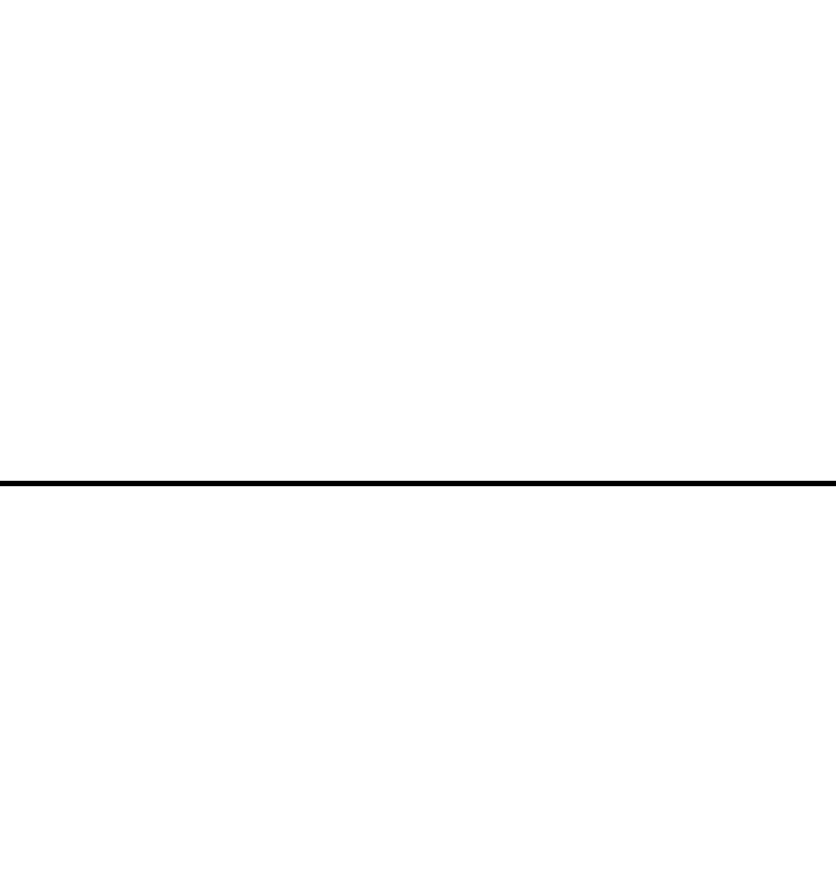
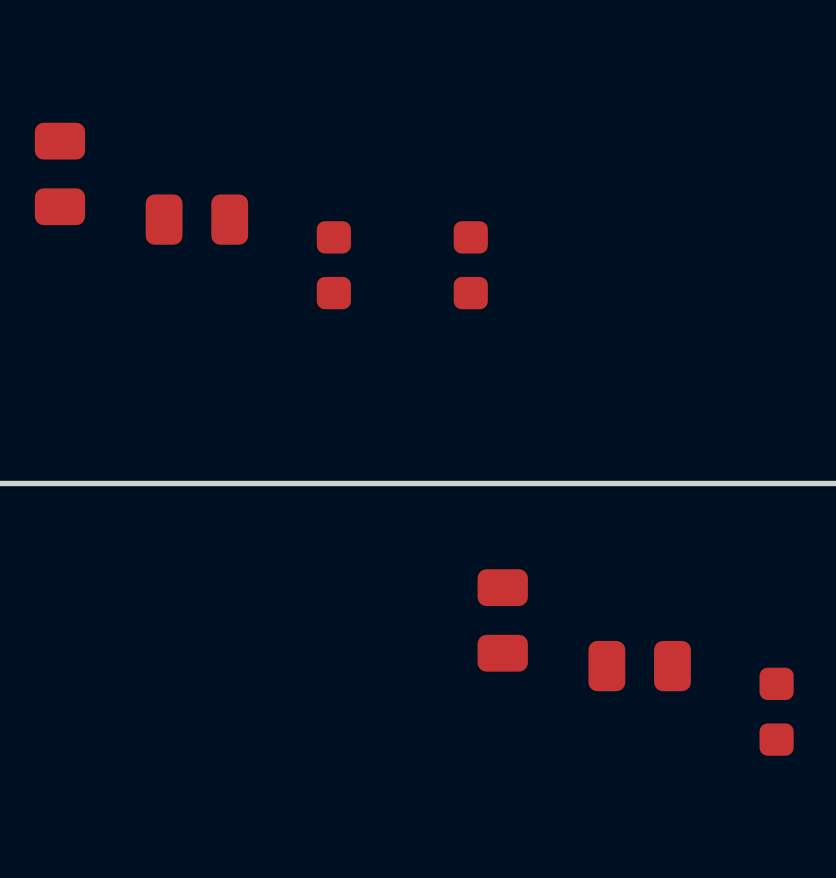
part: none -> (59, 173)
part: none -> (196, 219)
part: none -> (333, 265)
part: none -> (470, 265)
part: none -> (502, 620)
part: none -> (639, 666)
part: none -> (776, 711)

